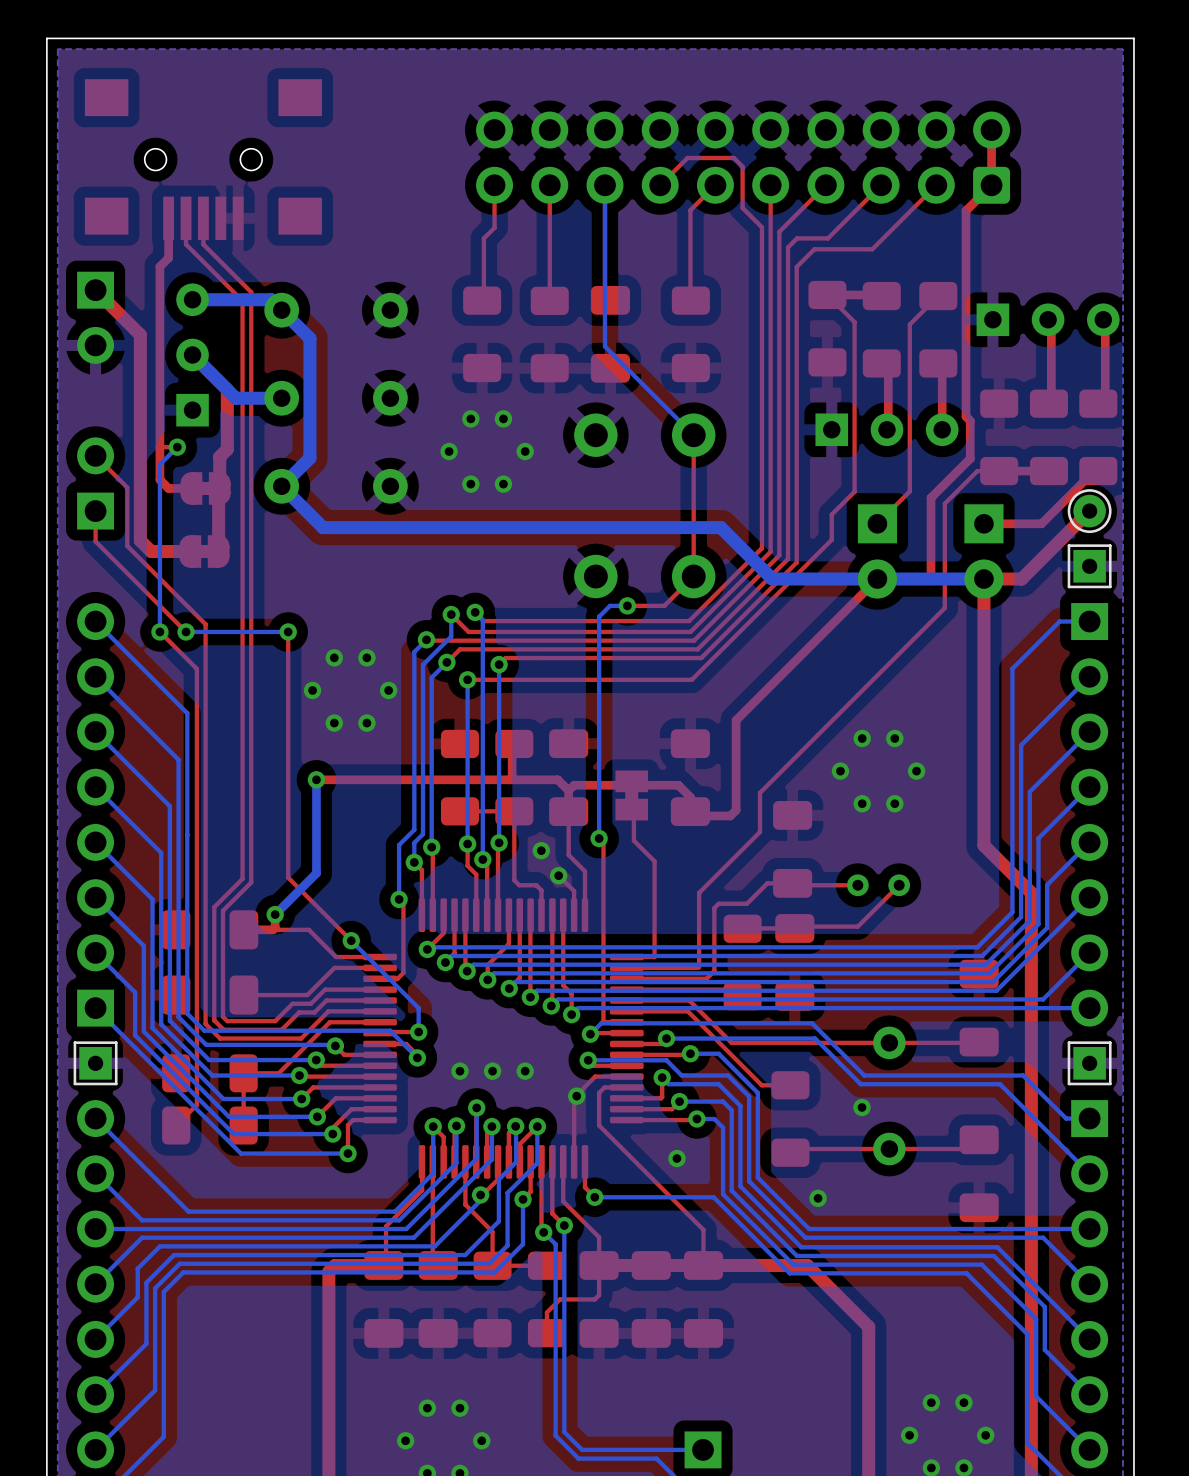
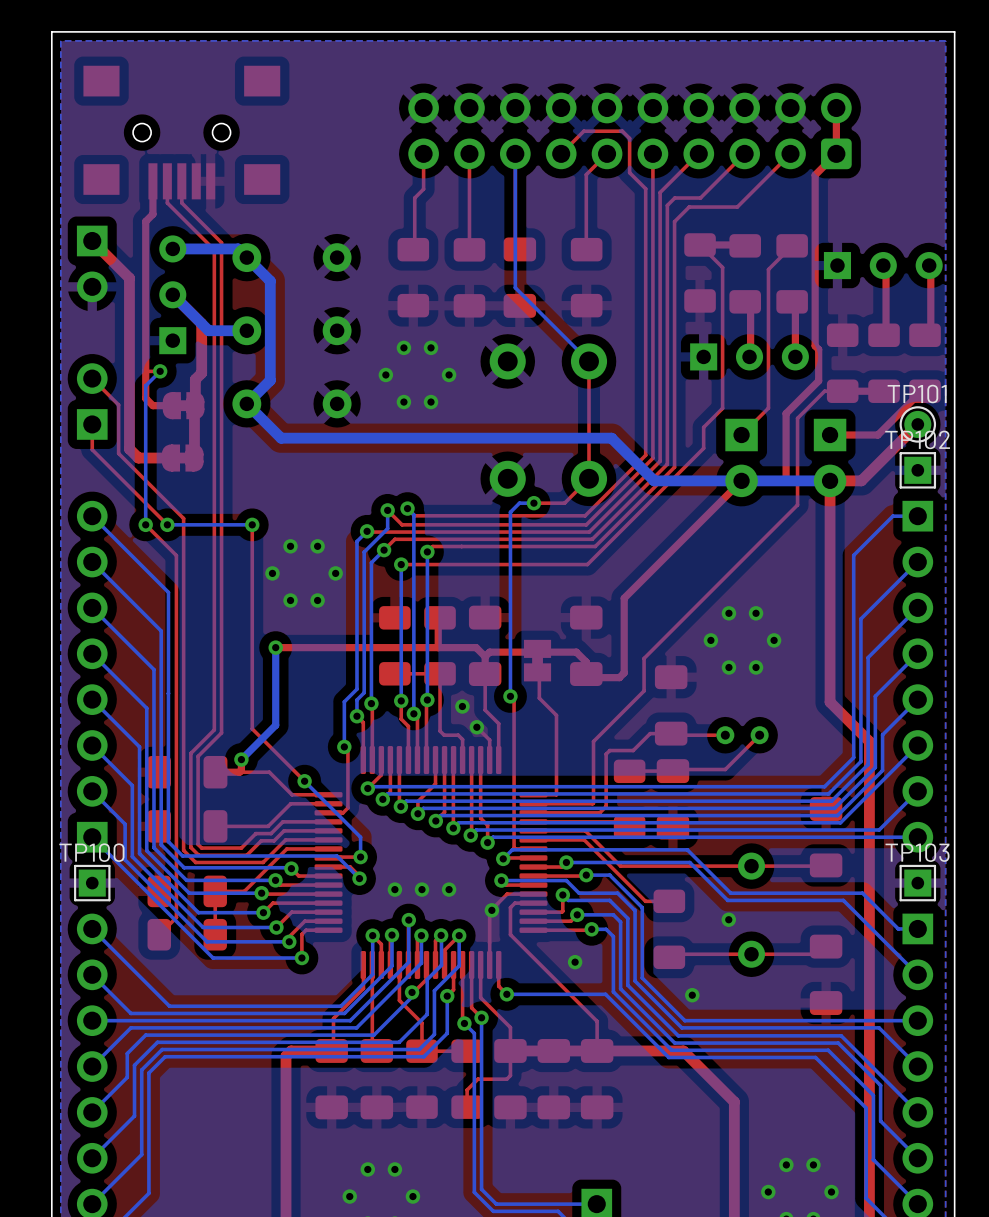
TP101 name: none -> TP101 (917, 394)
TP102 name: none -> TP102 (917, 439)
TP100 name: none -> TP100 (91, 852)
TP103 name: none -> TP103 (917, 852)

